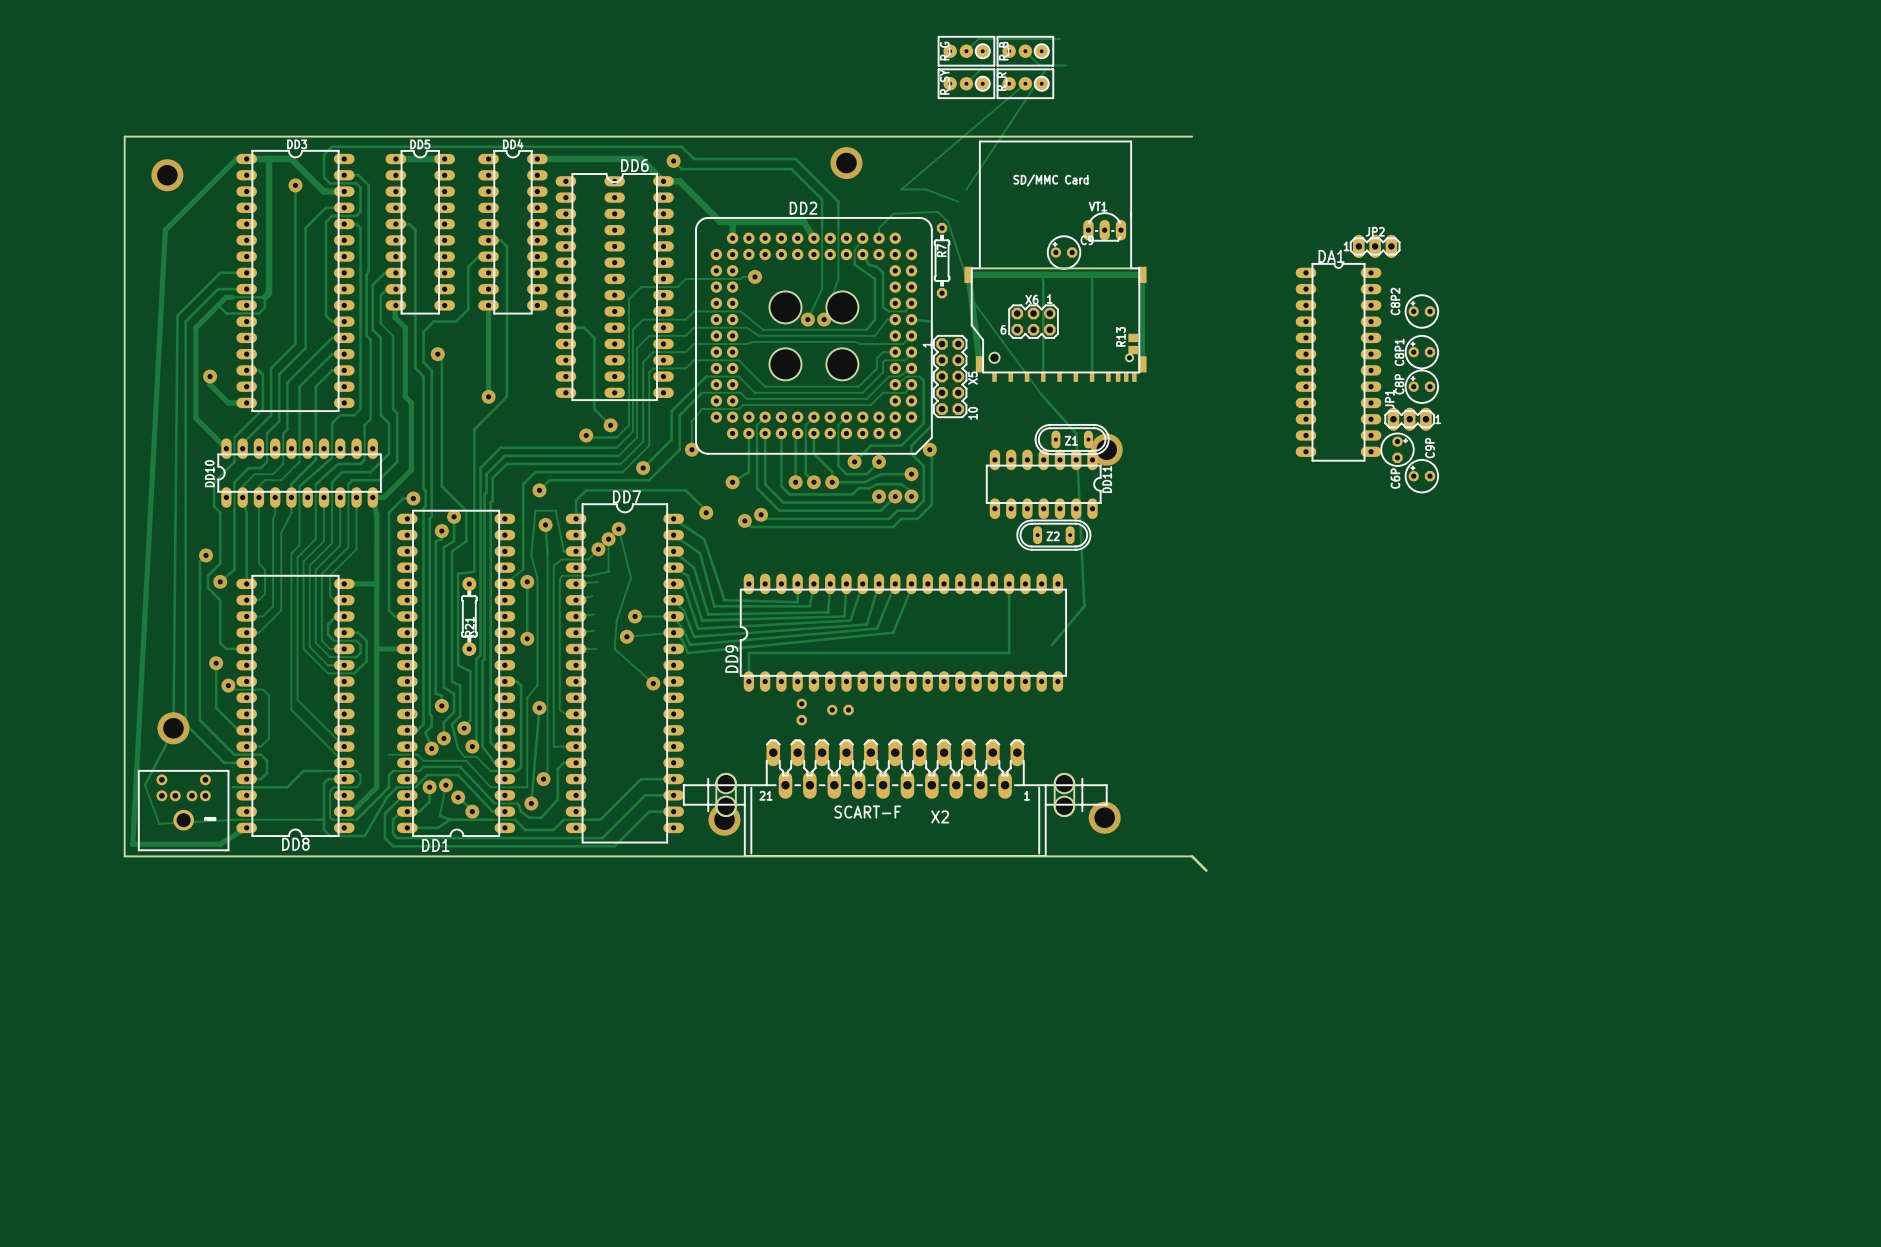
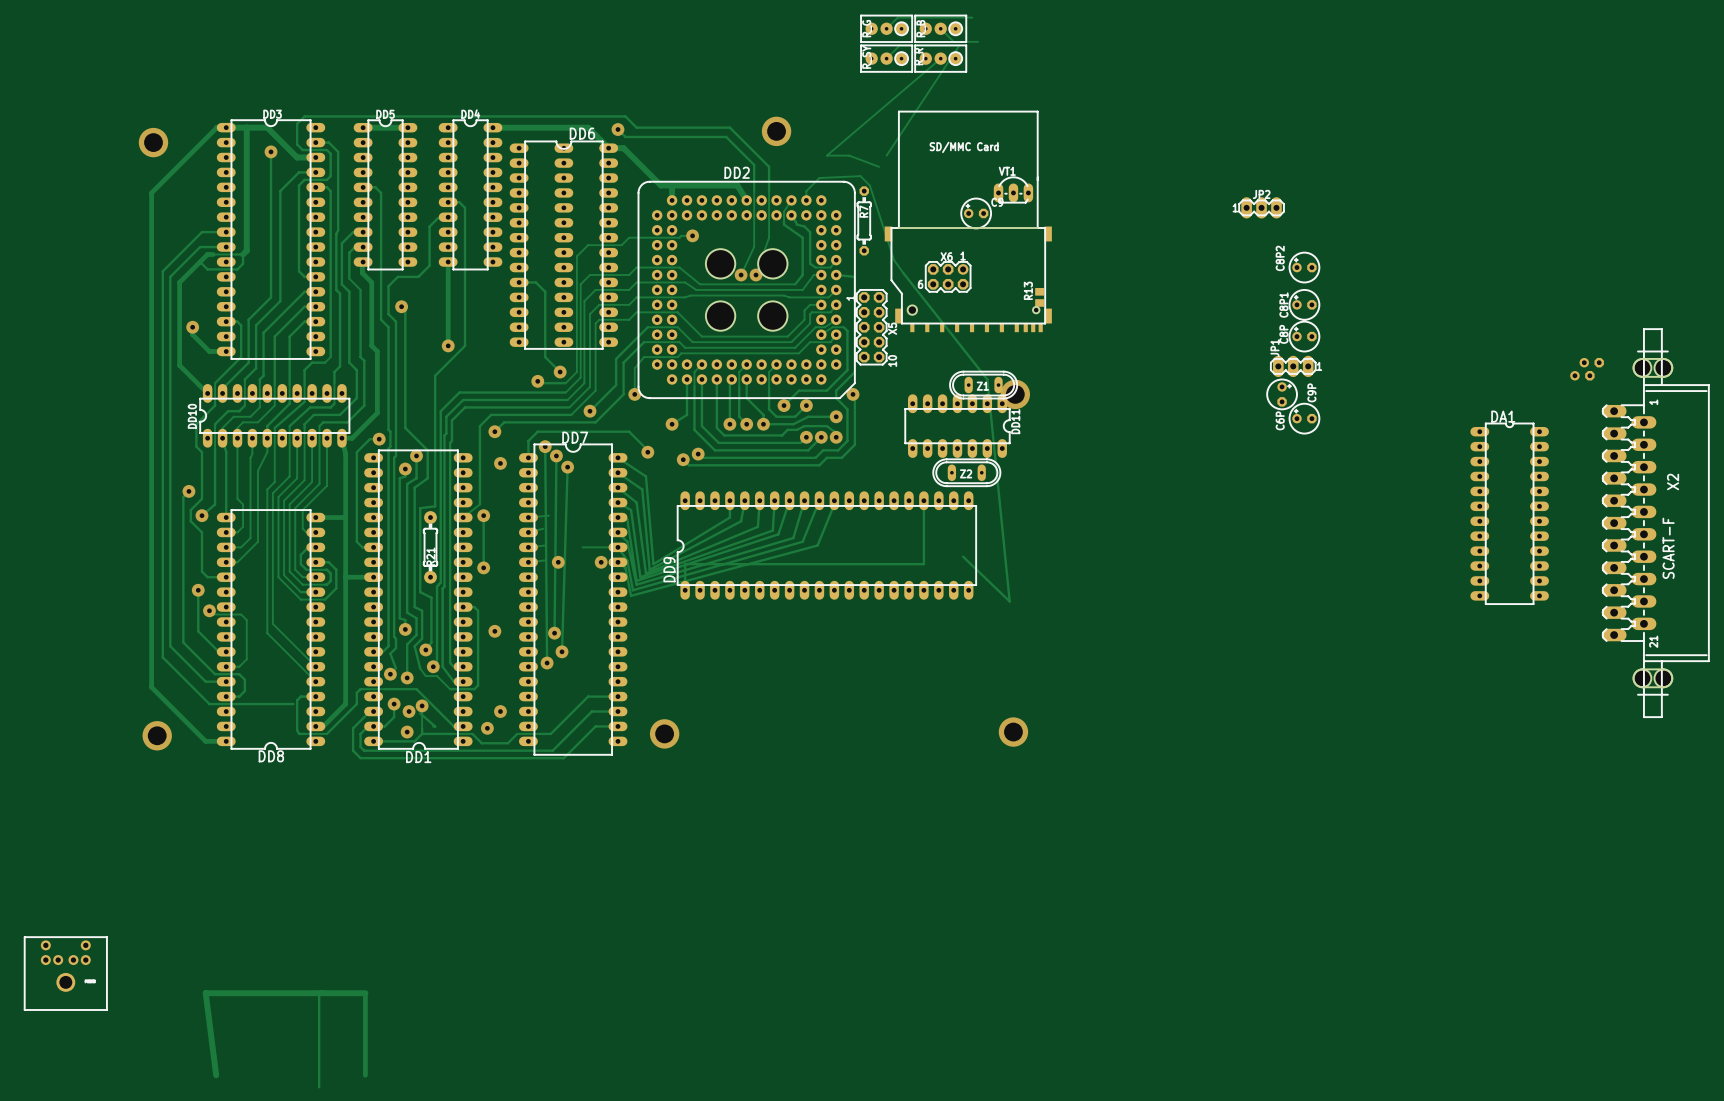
board edge: (1192, 136) (124, 136) (124, 856) (1192, 856) (1206, 870) -> none
track: (165, 230) (132, 844) (220, 844) (246, 827) -> (151, 192) (151, 687) (205, 741) (226, 741)
track: (1041, 274) (1043, 282) (1043, 377) -> none
track: (1094, 274) (1092, 277) (1092, 377) -> none
track: (974, 303) (1041, 394) (1076, 433) (1084, 606) (1051, 644) -> (894, 260) (987, 379) (1009, 601) (963, 556)
track: (177, 315) (173, 730) (145, 785) (159, 823) (234, 819) (323, 819) -> (162, 271) (162, 657) (209, 704) (213, 704)
DA1 position: (1338, 362) -> (1509, 513)
track: (979, 364) (968, 274) (1142, 274) (1142, 364) -> none
part: none -> (1591, 362)
part: none -> (1582, 375)
track: none -> (545, 446) (547, 663)
via: none -> (545, 446)
track: none -> (556, 455) (554, 633)
via: none -> (556, 455)
track: (545, 524) (547, 553) (547, 770) (543, 779) -> none
track: (618, 529) (630, 577) (616, 620) (614, 648) (653, 683) -> (567, 467) (562, 651)
track: (608, 539) (608, 571) (590, 575) (561, 575) (559, 579) (559, 709) (565, 714) (576, 714) -> none
via: (608, 539) -> none
track: (704, 539) (724, 600) (797, 602) (797, 583) -> (645, 476) (653, 564) (729, 517) (729, 500)
track: (598, 549) (588, 559) (561, 559) (553, 565) (553, 746) (576, 746) -> none
via: (598, 549) -> none
track: (576, 551) (563, 551) (555, 510) (535, 510) (531, 555) (537, 577) (537, 685) (527, 697) (527, 787) (490, 787) (466, 760) (423, 760) (417, 754) (389, 754) -> none
track: (700, 553) (714, 606) (809, 606) (813, 583) -> (642, 489) (649, 569) (741, 521) (744, 500)
track: (693, 567) (708, 614) (828, 612) (830, 583) -> (636, 502) (645, 573) (757, 526) (759, 500)
DD9 footprint: [740, 573, 1067, 692] -> [677, 491, 977, 600]
track: (687, 575) (702, 620) (844, 616) (846, 583) -> (631, 510) (640, 577) (772, 530) (774, 500)
track: (862, 583) (850, 620) (698, 628) (683, 585) -> (789, 500) (778, 534) (636, 580) (627, 519)
track: (879, 583) (866, 624) (693, 636) (683, 610) -> (804, 500) (793, 538) (636, 584) (627, 541)
track: (895, 583) (876, 628) (689, 644) (683, 630) -> (819, 500) (802, 541) (632, 590) (627, 560)
track: (911, 583) (893, 632) (687, 653) (681, 638) -> (834, 500) (817, 545) (631, 595) (625, 567)
track: (1009, 583) (1009, 653) (748, 653) (748, 681) -> (923, 500) (923, 564) (685, 564) (685, 590)
via: (635, 616) -> none
via: none -> (558, 562)
via: none -> (601, 562)
track: (673, 632) (626, 636) -> none
via: (626, 636) -> none
track: (576, 648) (596, 648) -> none
via: (653, 683) -> none
track: (539, 707) (531, 803) -> none
via: none -> (554, 633)
part: (840, 709) -> none
part: (801, 712) -> none
via: (173, 728) -> none
via: none -> (562, 651)
track: none -> (407, 659) (407, 677)
via: (443, 738) -> none
X2 footprint: [683, 739, 1108, 857] -> [1601, 328, 1710, 718]
via: none -> (547, 663)
via: (431, 748) -> none
via: none -> (390, 674)
via: none -> (407, 677)
track: (576, 762) (563, 762) (557, 768) (557, 799) (541, 817) (529, 817) (521, 811) (517, 803) (494, 803) (460, 766) (423, 766) (419, 770) -> (453, 726) (416, 689) (384, 689)
via: (543, 779) -> none
track: (445, 785) (439, 815) (450, 819) -> none
via: (445, 785) -> none
track: (287, 787) (303, 770) (356, 770) (360, 775) (360, 783) (356, 787) (334, 787) (330, 791) (330, 817) (332, 819) -> (263, 704) (293, 704)
via: none -> (422, 705)
via: none -> (409, 711)
via: none -> (500, 711)
via: (458, 797) -> none
via: (531, 803) -> none
part position: (183, 810) -> (65, 973)
via: (472, 811) -> none
track: (494, 811) (458, 775) (427, 775) (415, 787) (397, 787) (386, 797) (364, 836) (330, 836) (323, 829) (323, 815) -> (304, 733) (298, 733) (297, 730)
via: none -> (487, 728)
X2 name position: X2 (940, 816) -> X2 (1673, 481)
via: none -> (407, 732)
track: (450, 819) (437, 827) -> (422, 705) (422, 733) (414, 741) (401, 741)
track: (450, 819) (460, 819) -> none
via: none -> (157, 735)
DD1 name position: DD1 (435, 845) -> DD1 (418, 757)
track: none -> (321, 993) (319, 995) (319, 1087)
track: none -> (216, 1075) (205, 993) (365, 993) (365, 1075)

